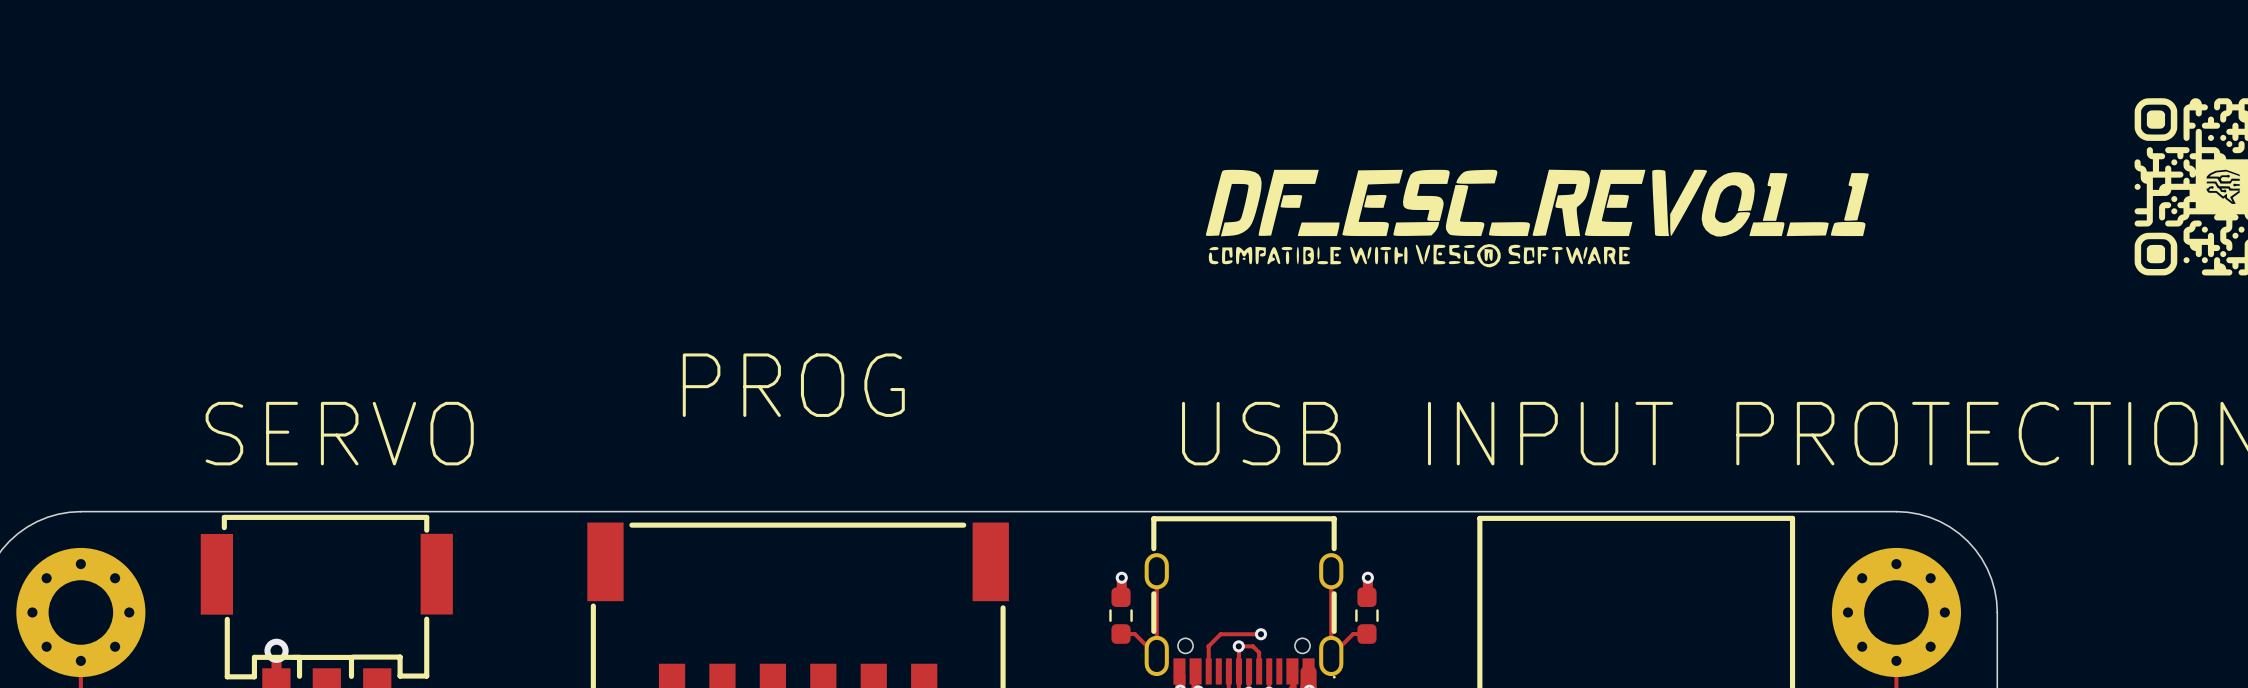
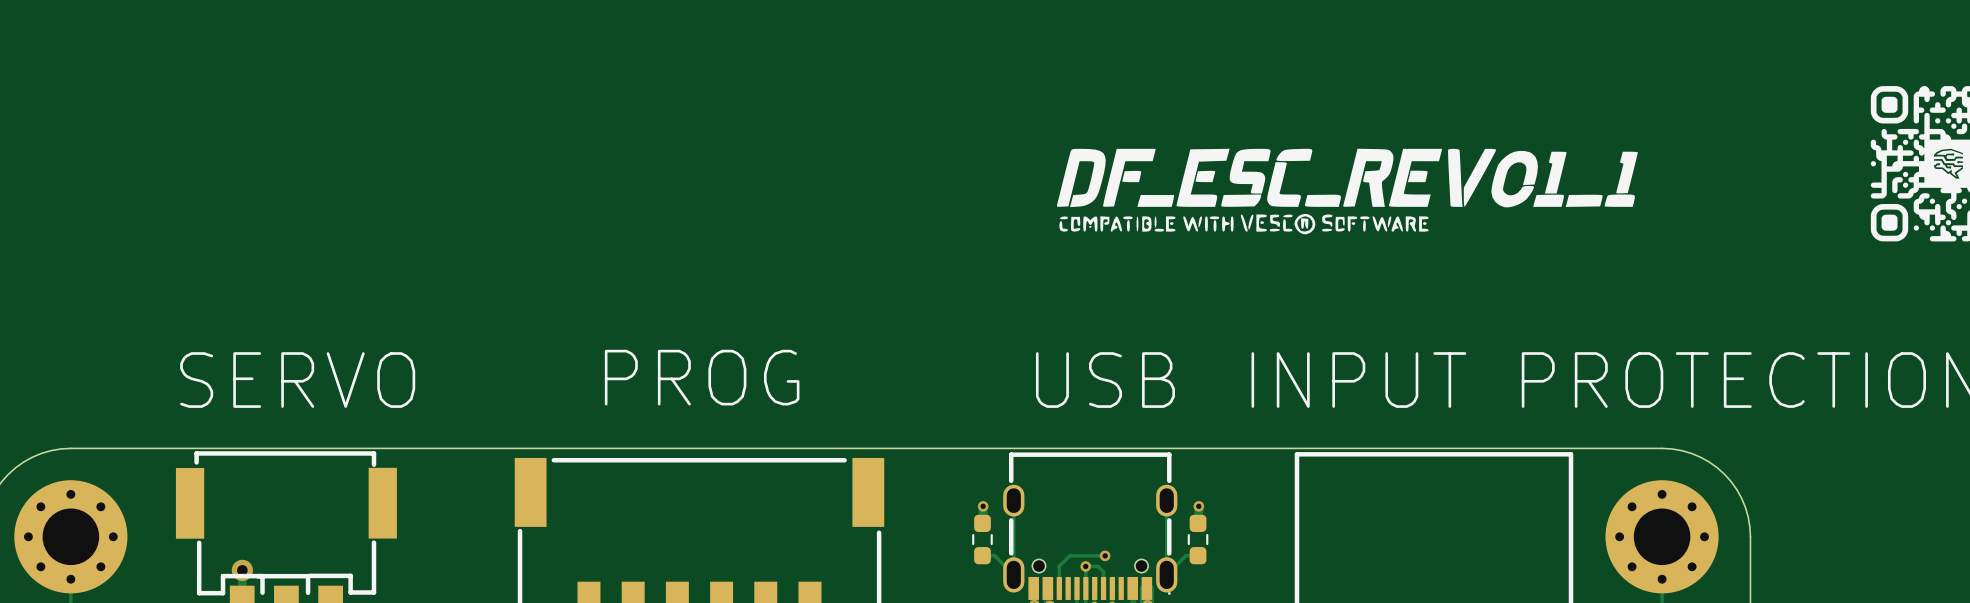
text position: PROG (793, 385) -> PROG (702, 377)

